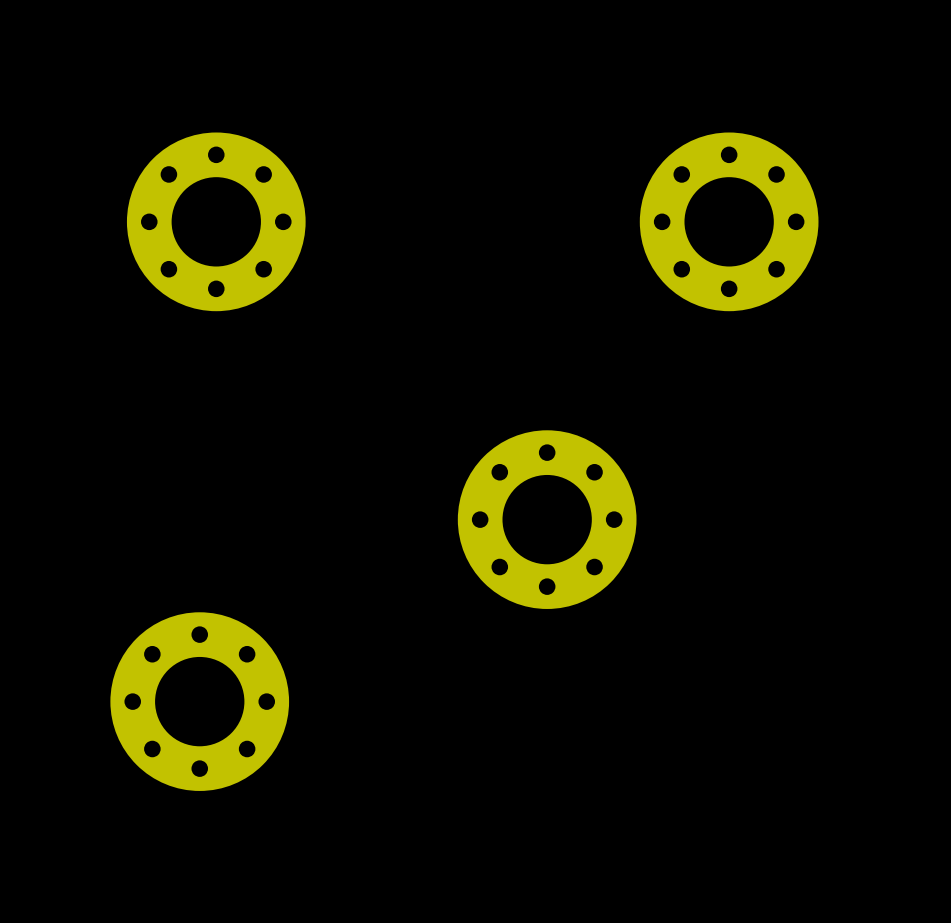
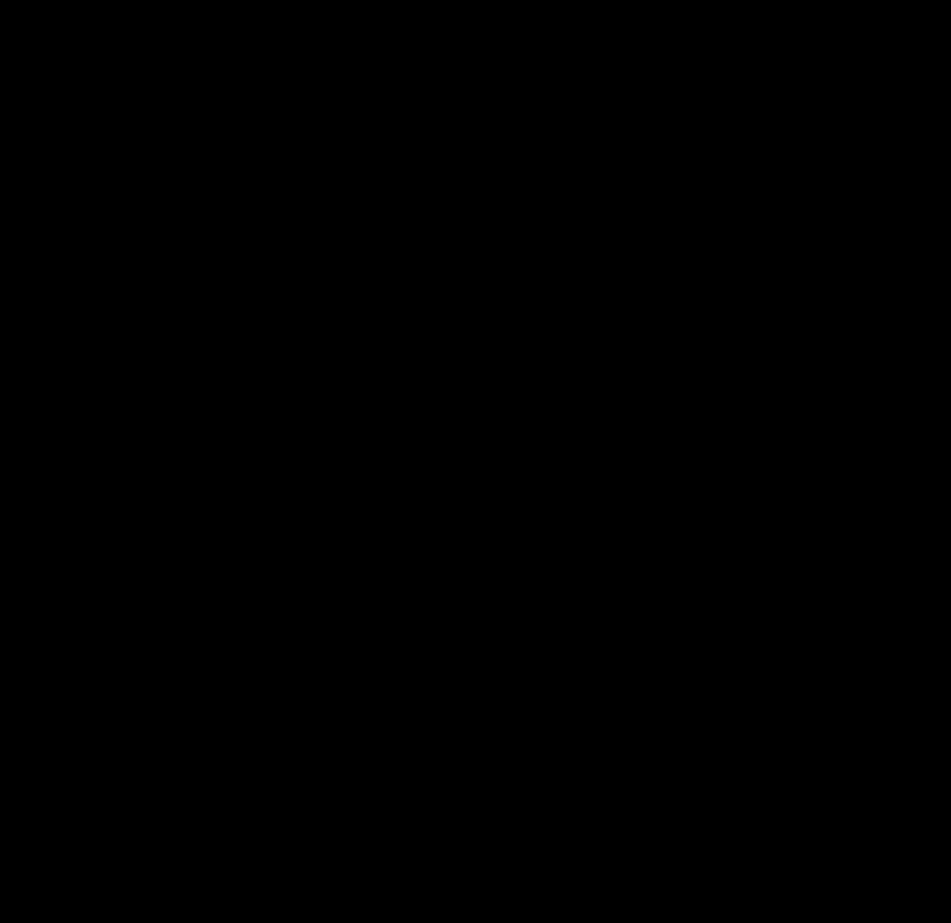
part: (216, 221) -> none
part: (729, 221) -> none
part: (547, 519) -> none
part: (199, 701) -> none

